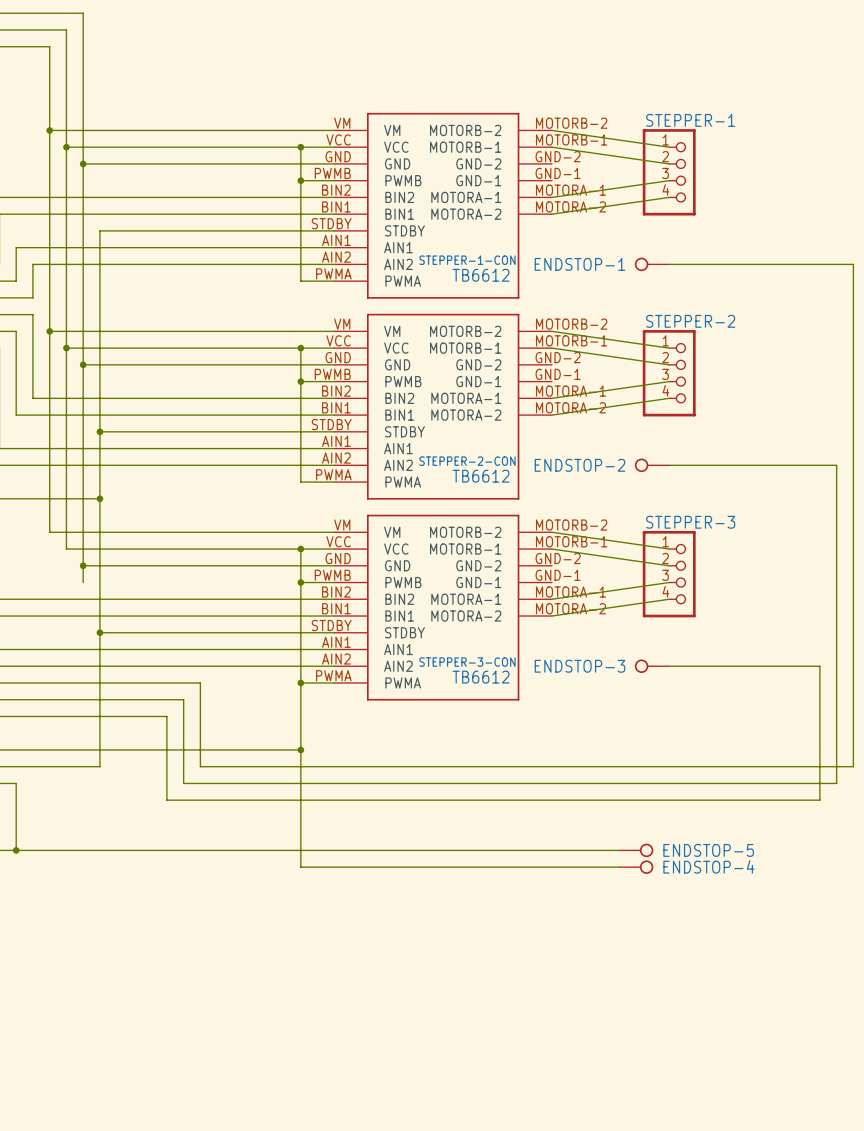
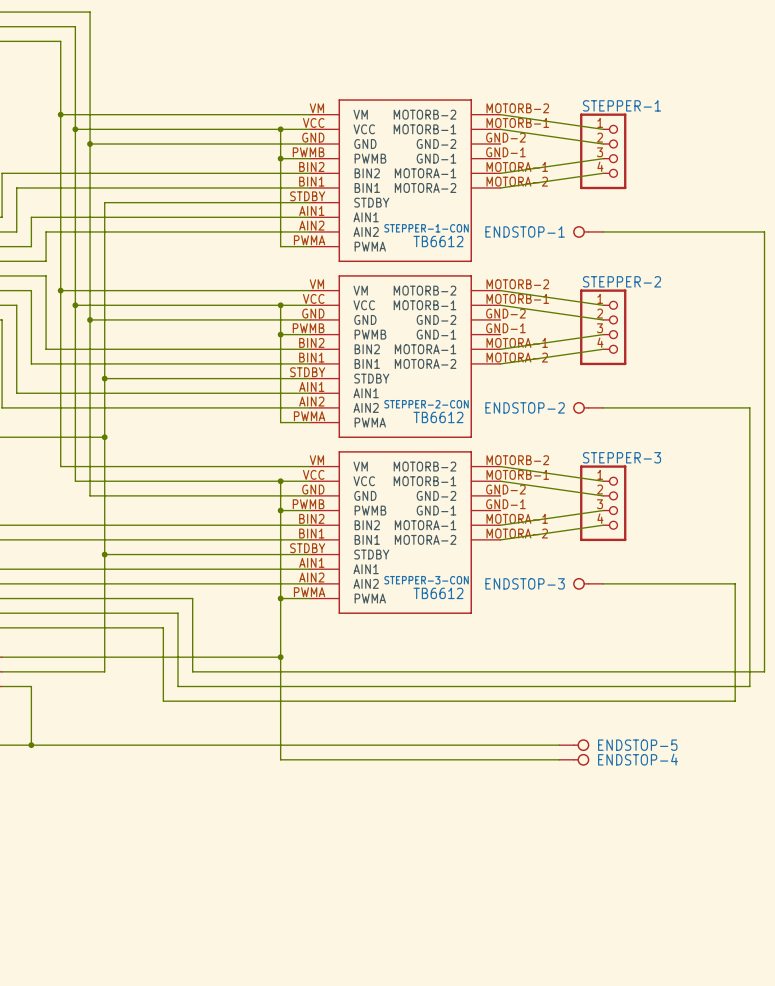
wire: (83, 565) (83, 582) -> none
junction: (83, 565) -> none

